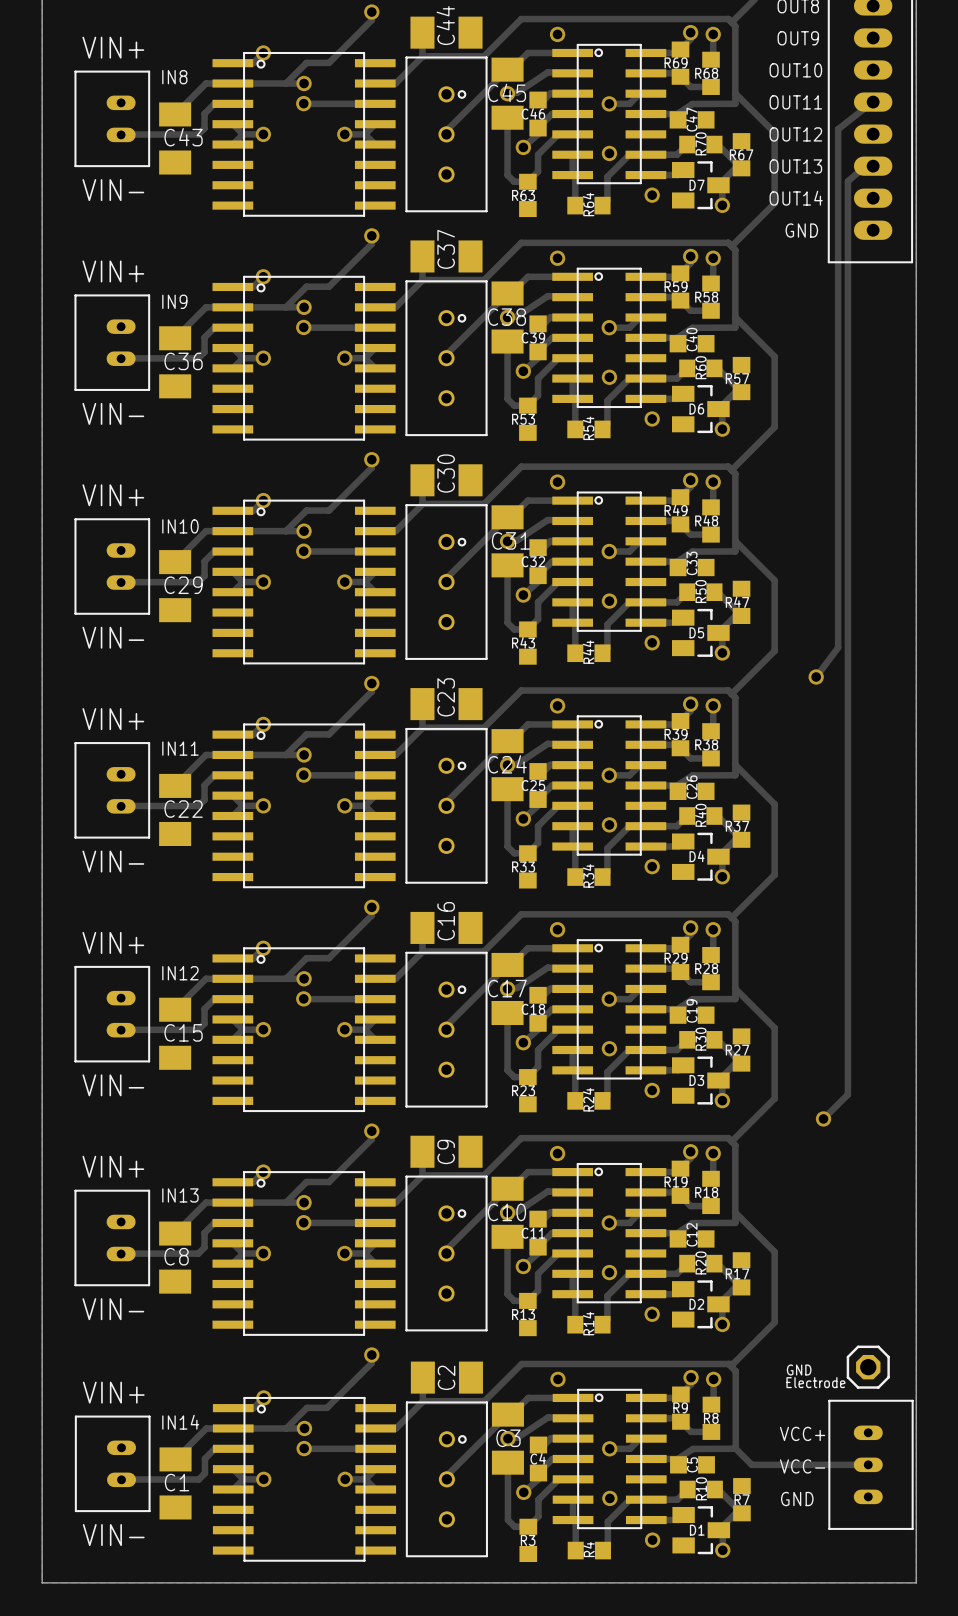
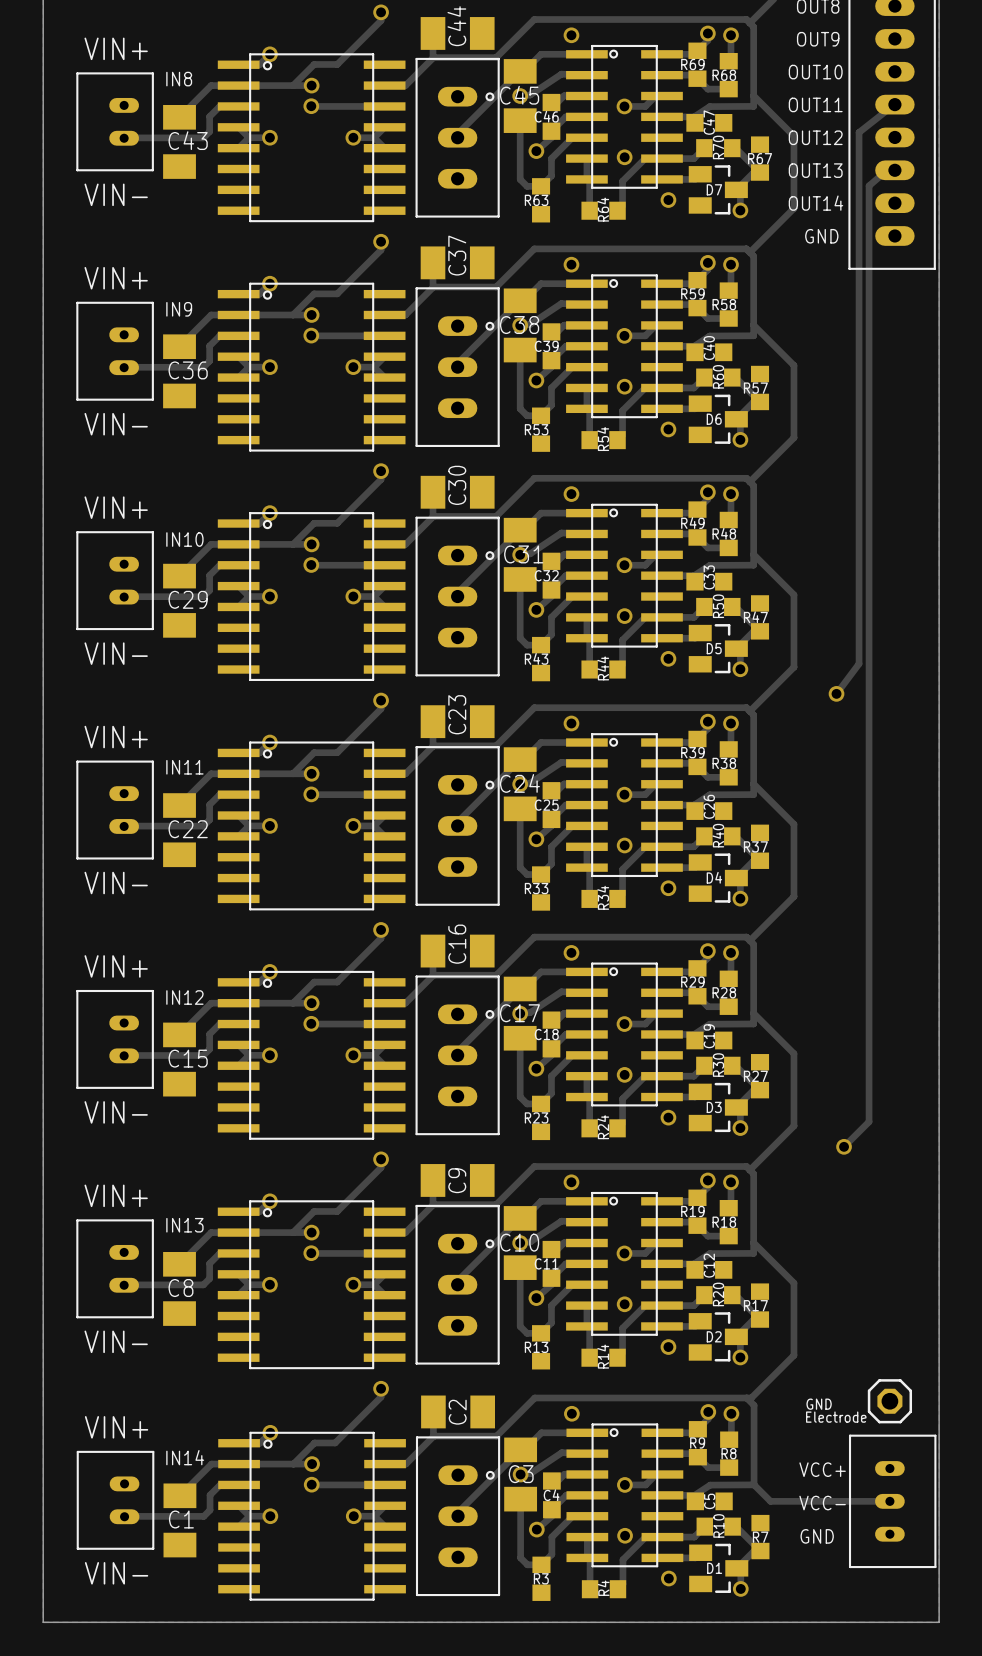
part footprint: [405, 56, 488, 213] -> [415, 57, 500, 218]
part footprint: [405, 280, 488, 437] -> [415, 287, 500, 447]
part footprint: [405, 504, 488, 660] -> [415, 516, 500, 677]
part footprint: [405, 727, 488, 884] -> [415, 746, 500, 906]
part footprint: [405, 951, 488, 1108] -> [415, 975, 500, 1136]
part footprint: [405, 1175, 488, 1332] -> [415, 1204, 500, 1365]
part footprint: [405, 1401, 488, 1558] -> [415, 1436, 501, 1597]

